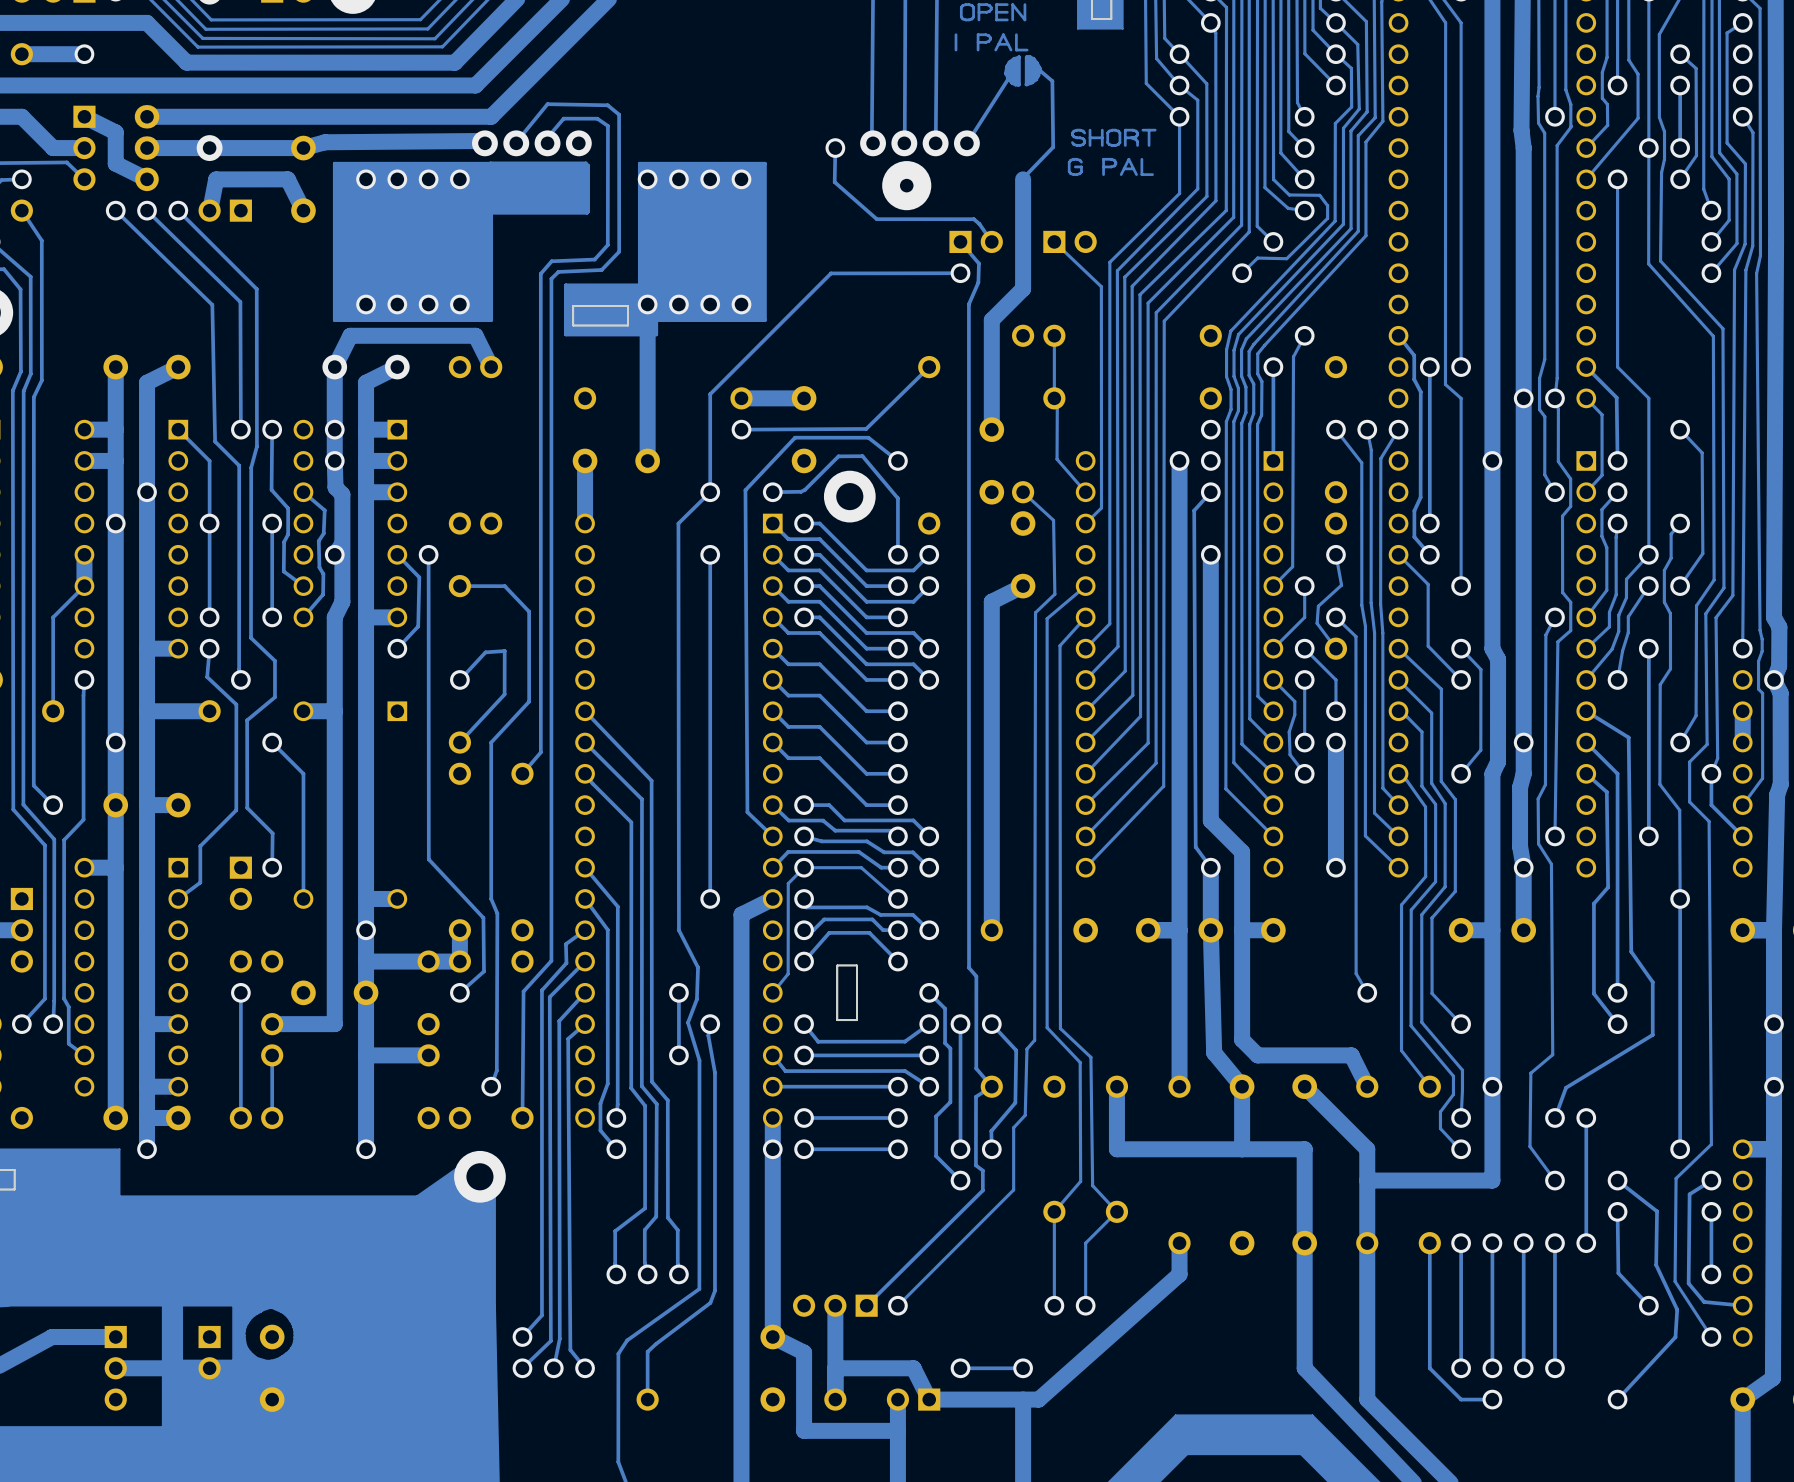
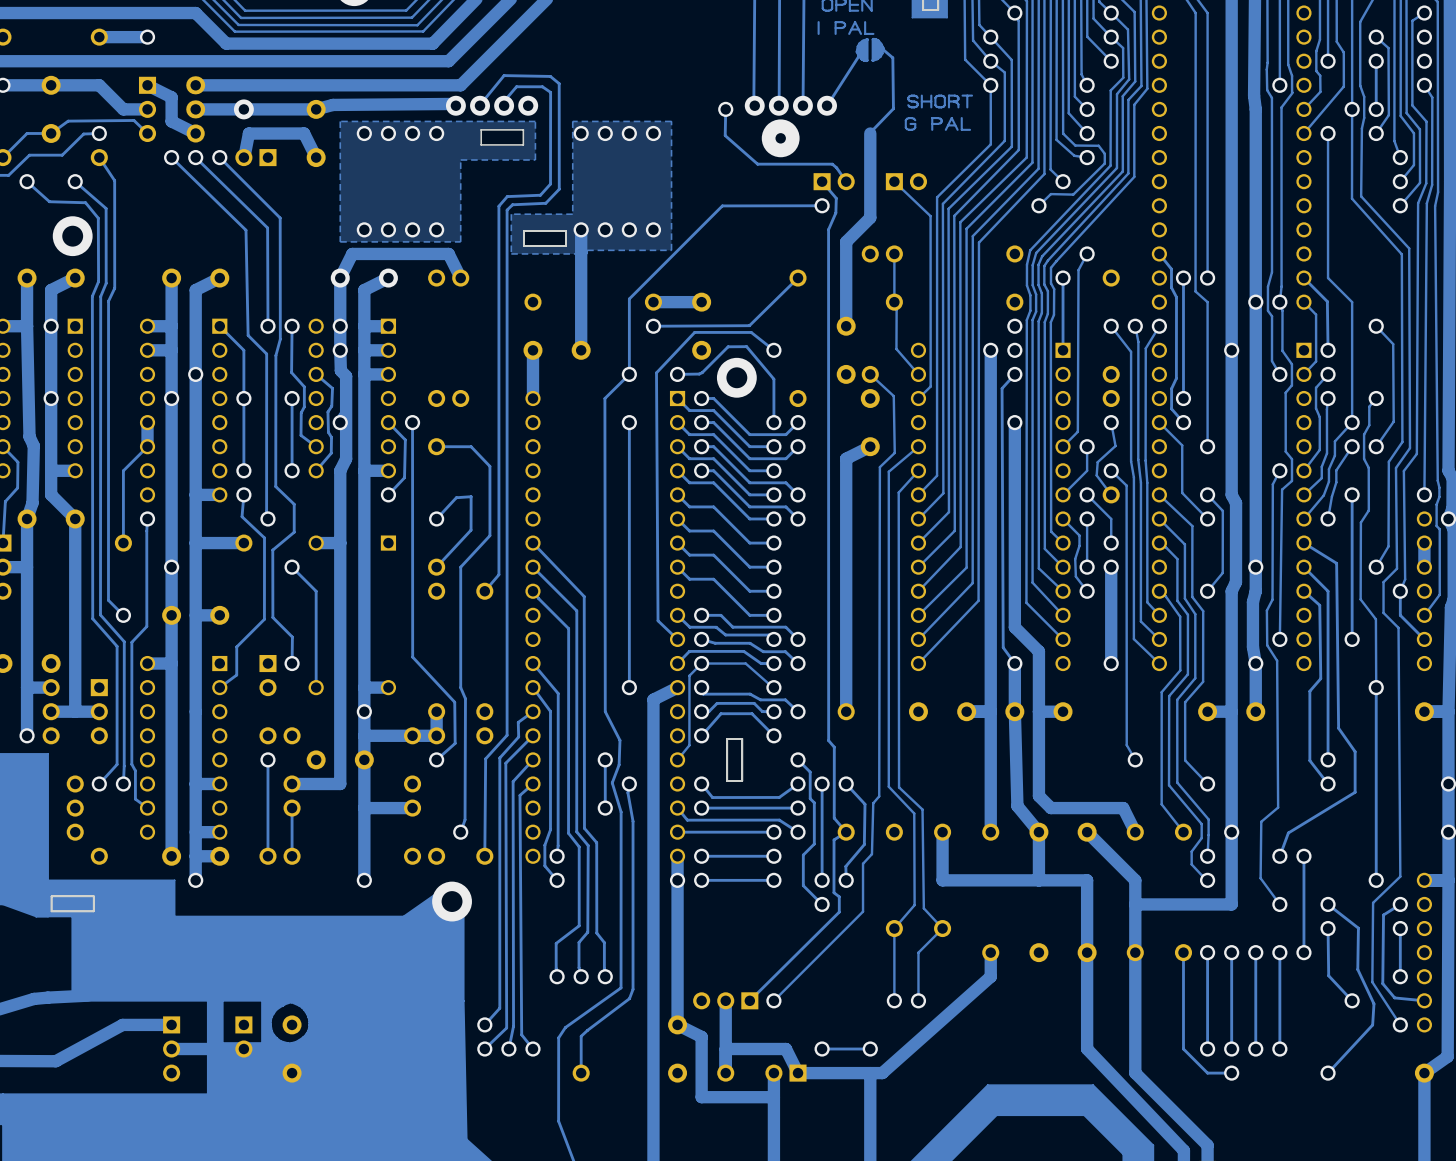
drawing: [334, 163, 589, 321] -> none
track: (491, 163) (334, 163) (334, 320) (491, 320) (491, 163) -> none
drawing: [565, 163, 765, 335] -> none
track: (585, 163) (588, 165) (586, 213) (488, 213) (487, 166) (490, 163) (585, 163) -> none
zone outline: none -> (535, 121) (340, 121) (340, 241) (460, 241) (460, 159) (535, 159) (535, 121)
track: (764, 163) (639, 163) (639, 320) (764, 320) (764, 163) -> none
zone outline: none -> (671, 121) (572, 121) (572, 214) (511, 214) (511, 253) (587, 253) (587, 250) (671, 250) (671, 121)
board edge: none -> (523, 129) (523, 144) (481, 144) (481, 129) (523, 129)
track: (657, 285) (565, 285) (565, 334) (656, 334) (657, 285) -> none

